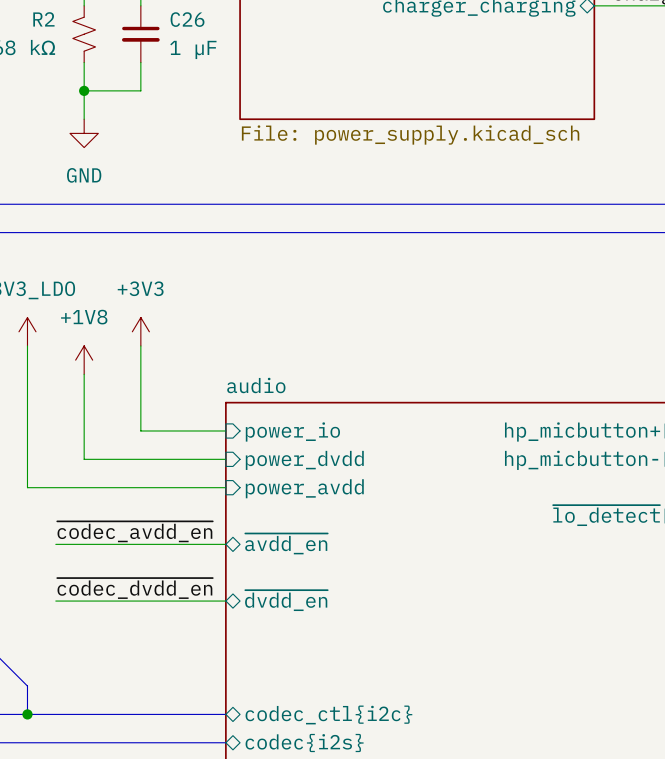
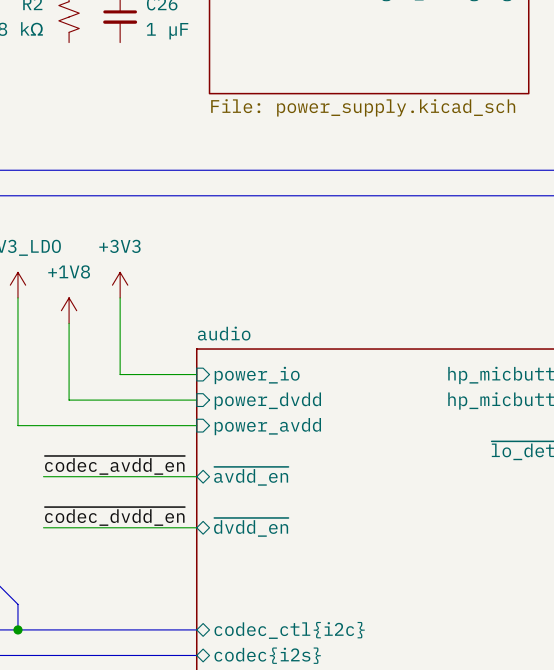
wire: (84, 62) (84, 119) -> none
wire: (140, 62) (140, 90) (84, 90) -> none
junction: (84, 90) -> none
power symbol: GND (84, 133) -> none

